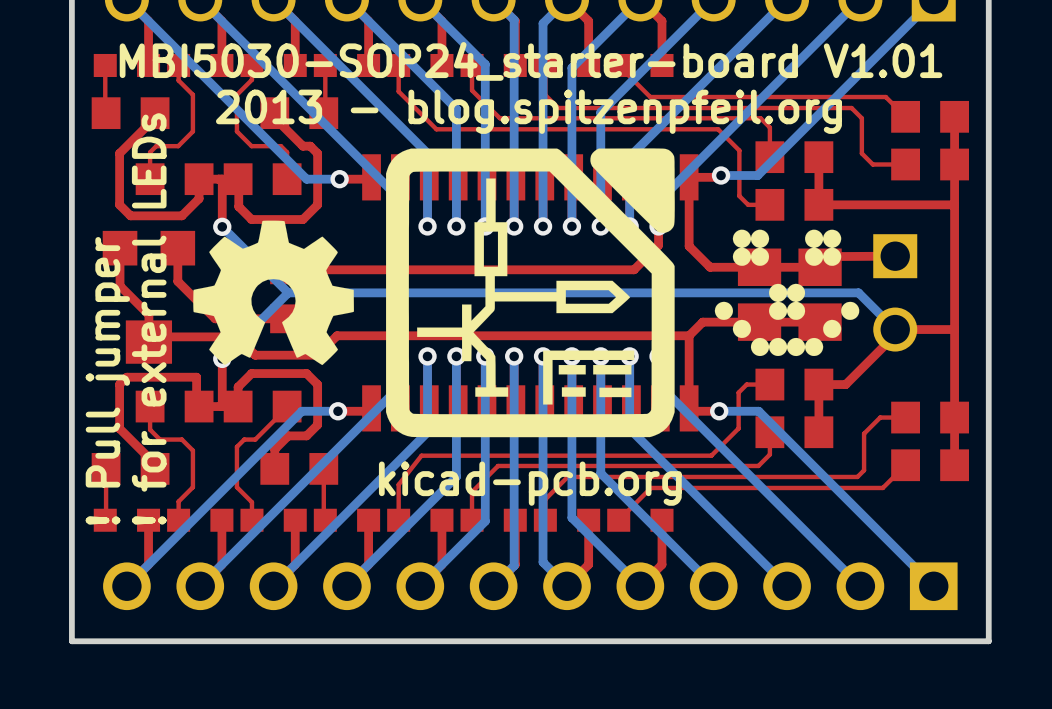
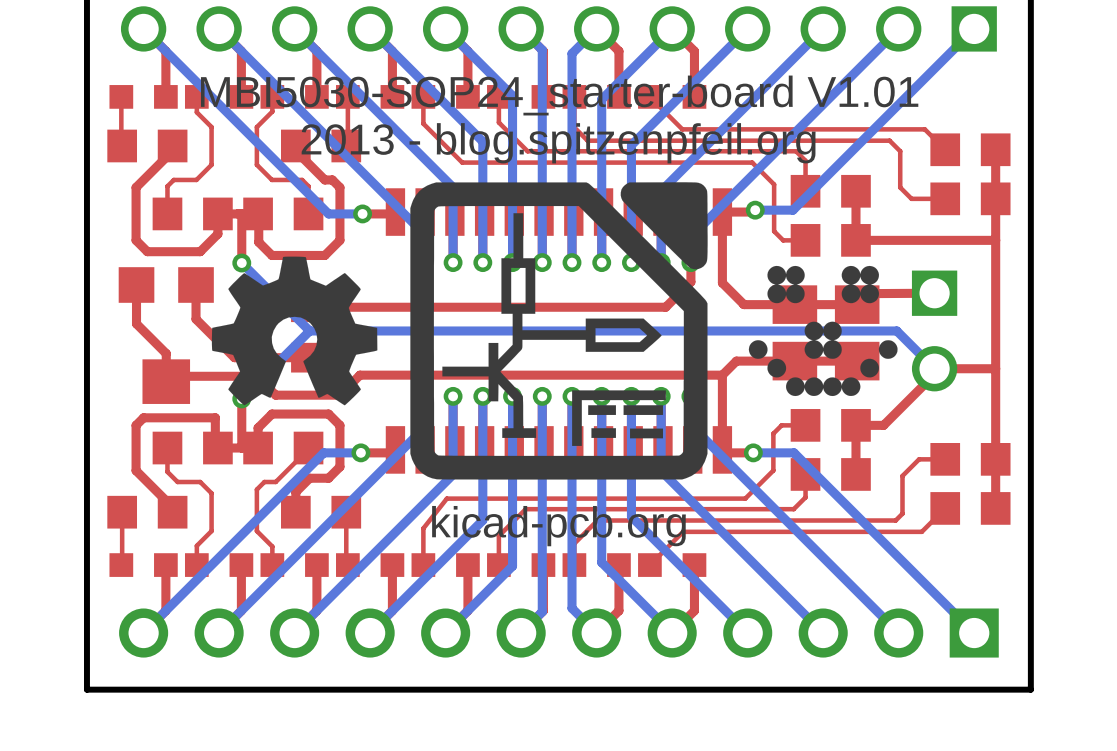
text: ! for external LEDs (149, 318) -> none
text: ! Pull jumper (107, 380) -> none

